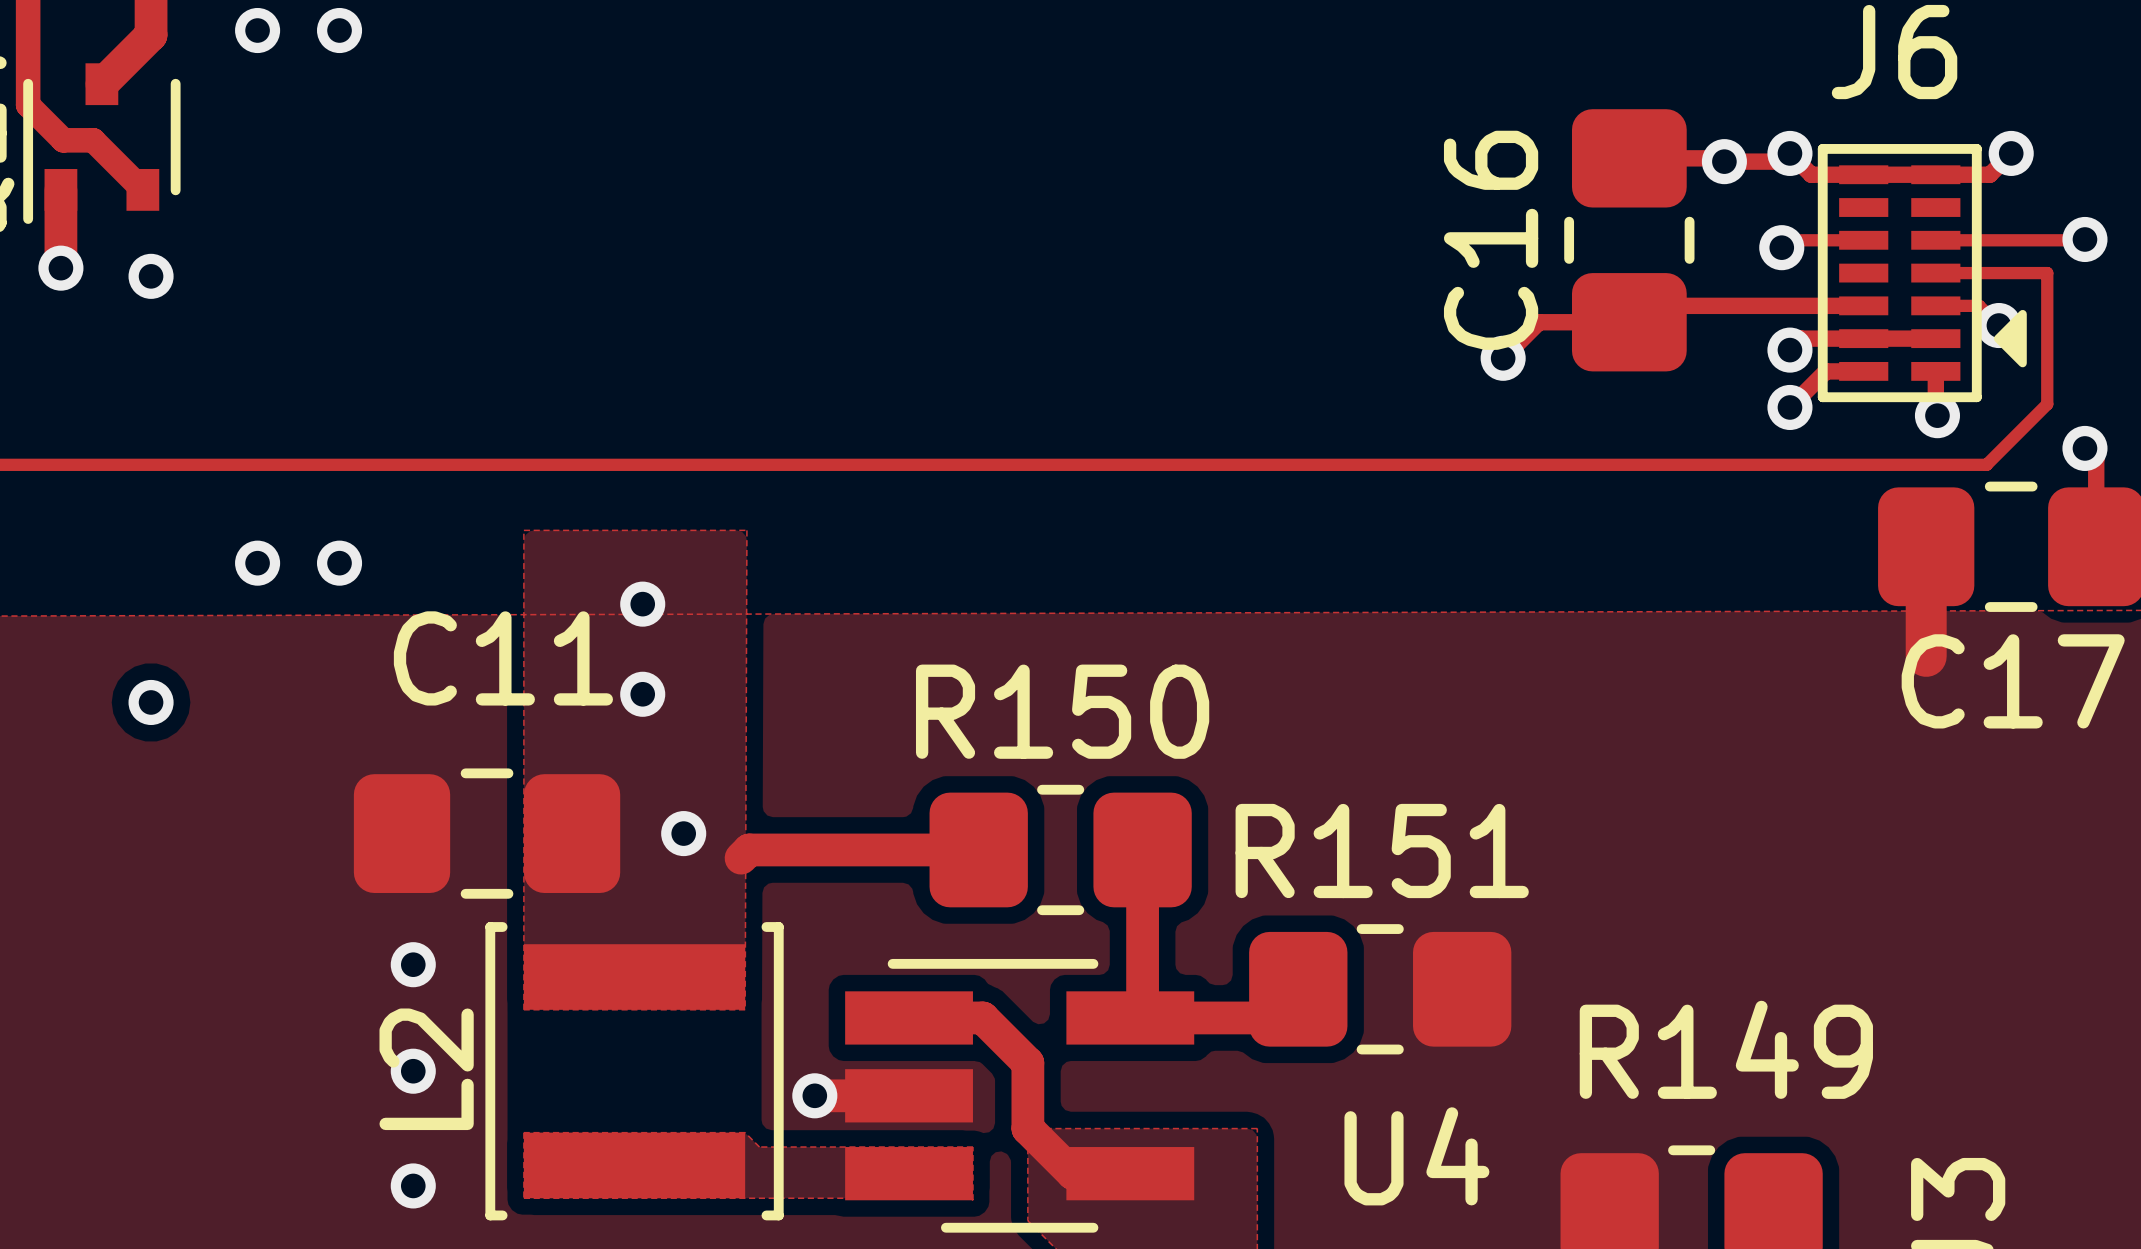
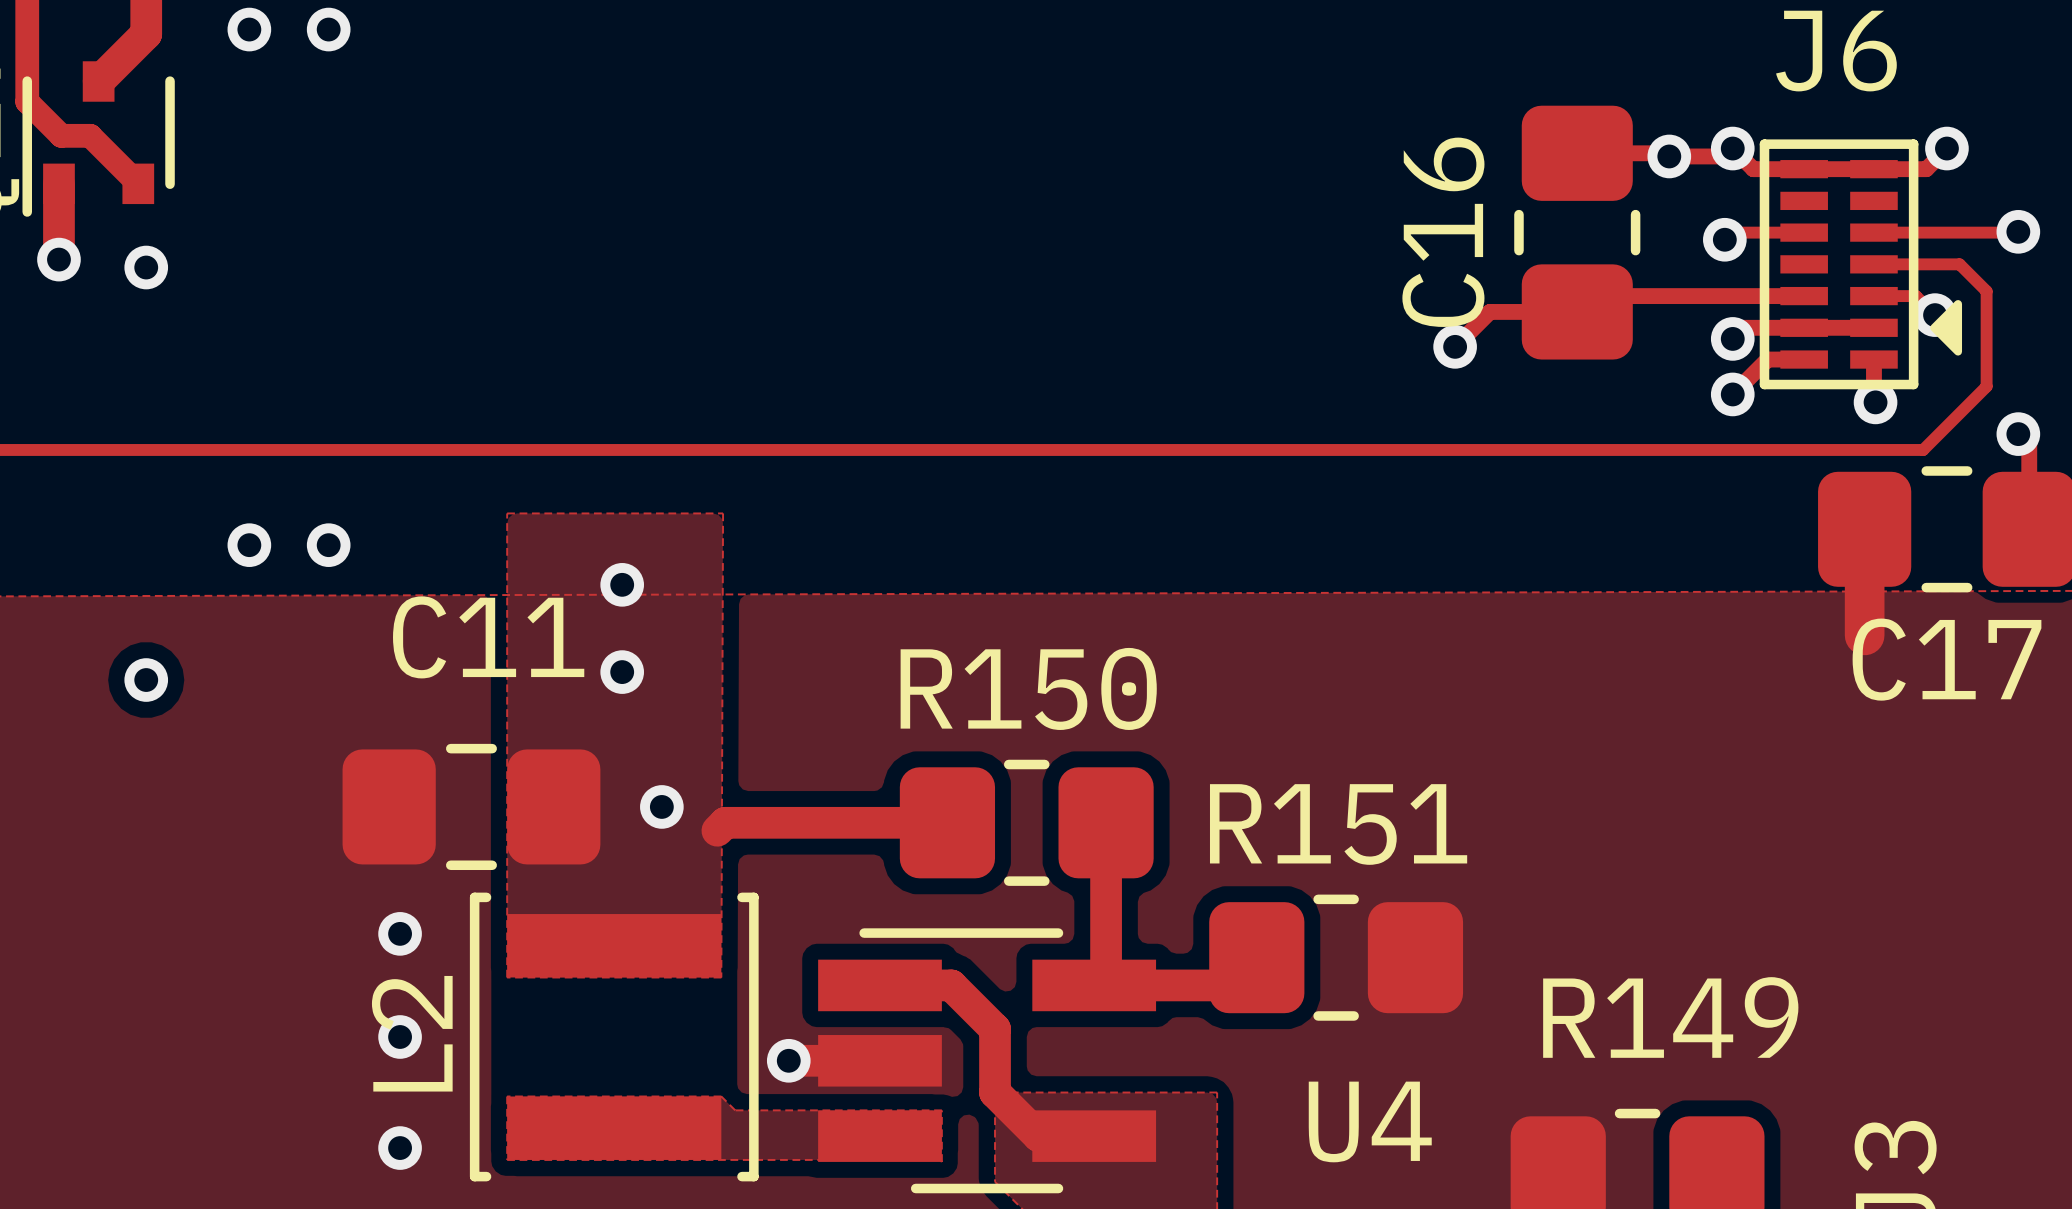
track: (2024, 273) (2047, 273) (2047, 404) -> (1959, 264) (1986, 291) (1986, 386) (1981, 391)

